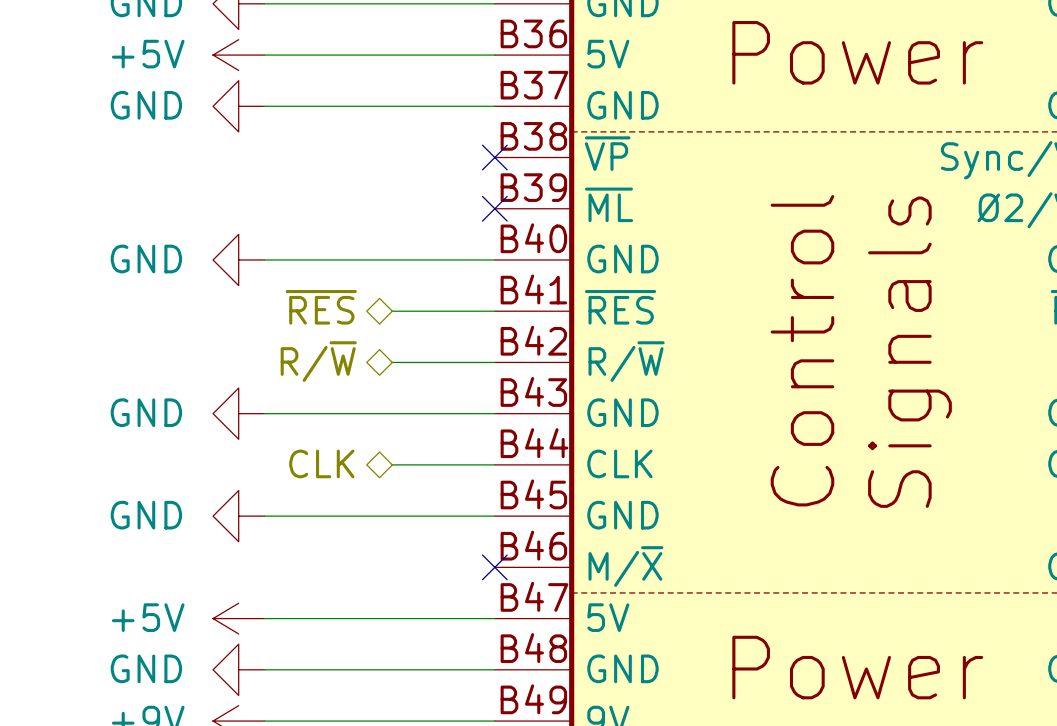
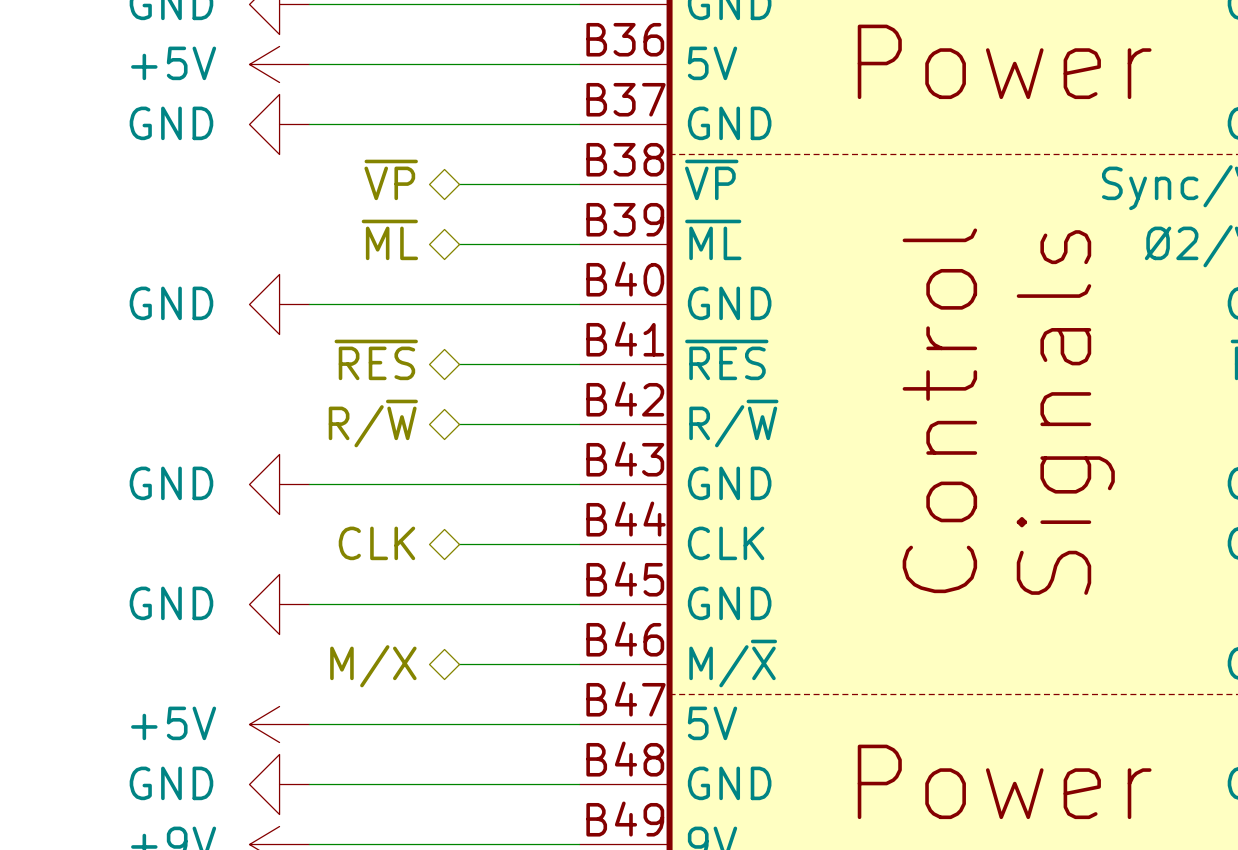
hierarchical label: none -> ~{VP} (391, 179)
wire: none -> (459, 184) (579, 184)
no-connect mark: (494, 157) -> none
hierarchical label: none -> ~{ML} (389, 239)
wire: none -> (459, 244) (579, 244)
no-connect mark: (494, 208) -> none
wire: none -> (459, 664) (579, 664)
no-connect mark: (494, 567) -> none
hierarchical label: none -> M/X (373, 666)

